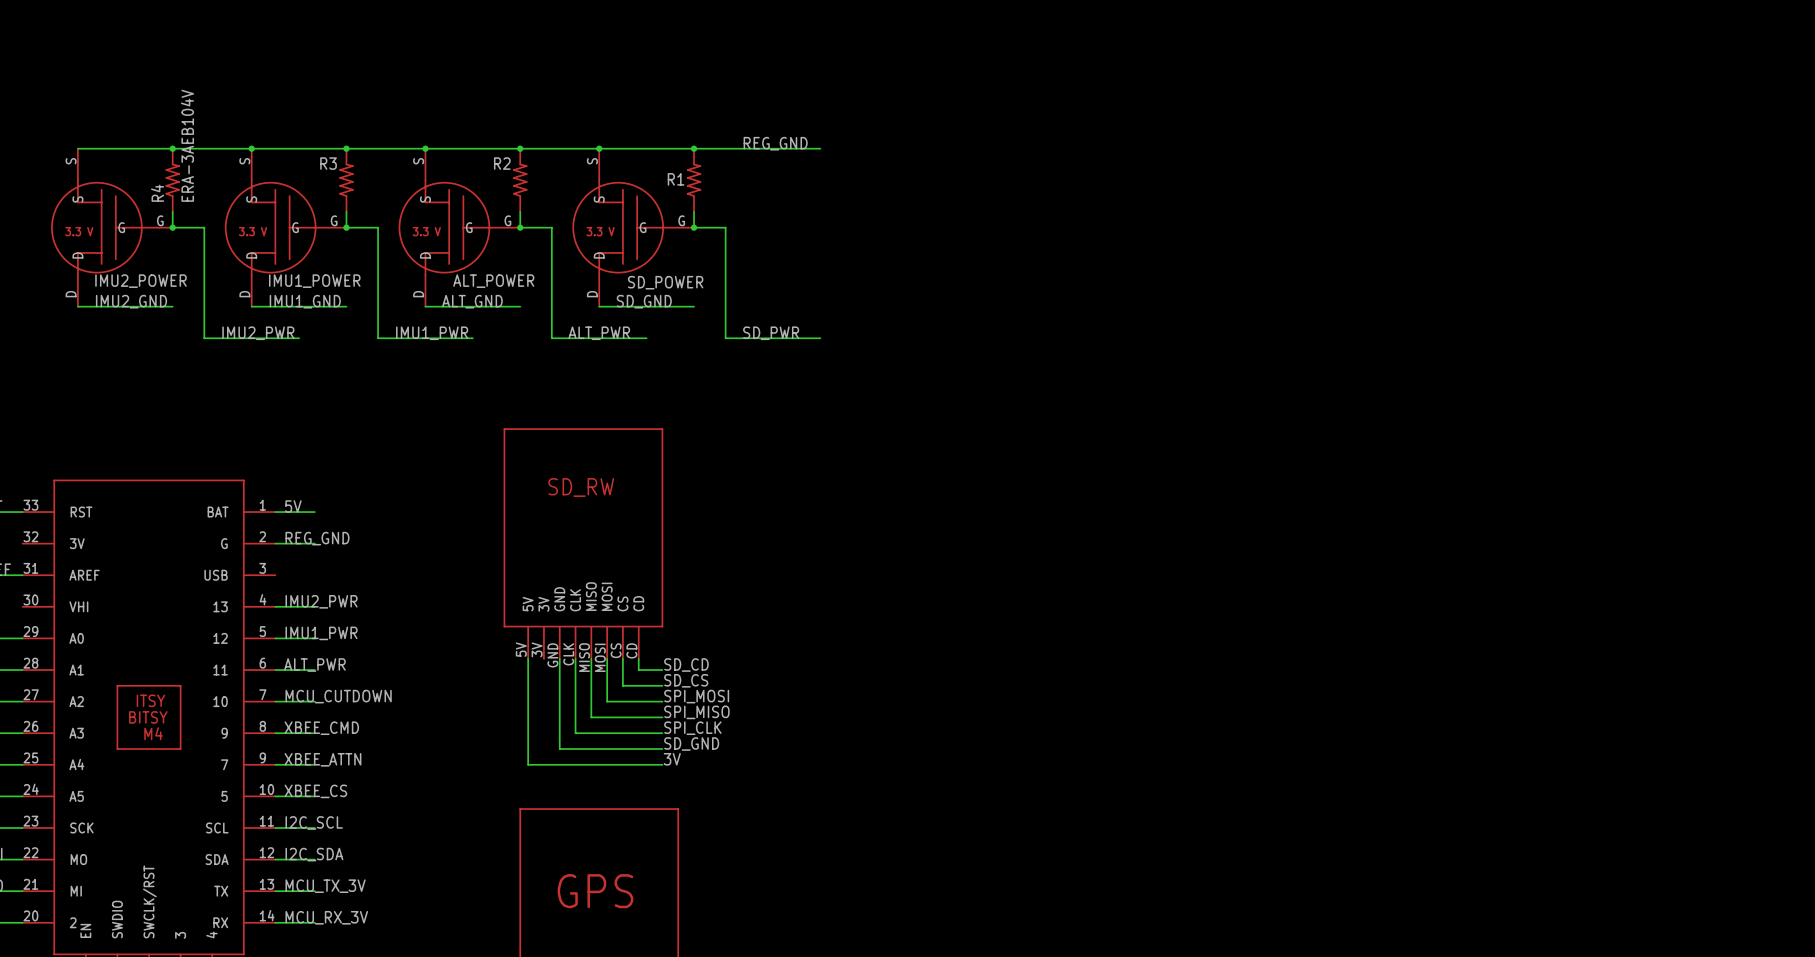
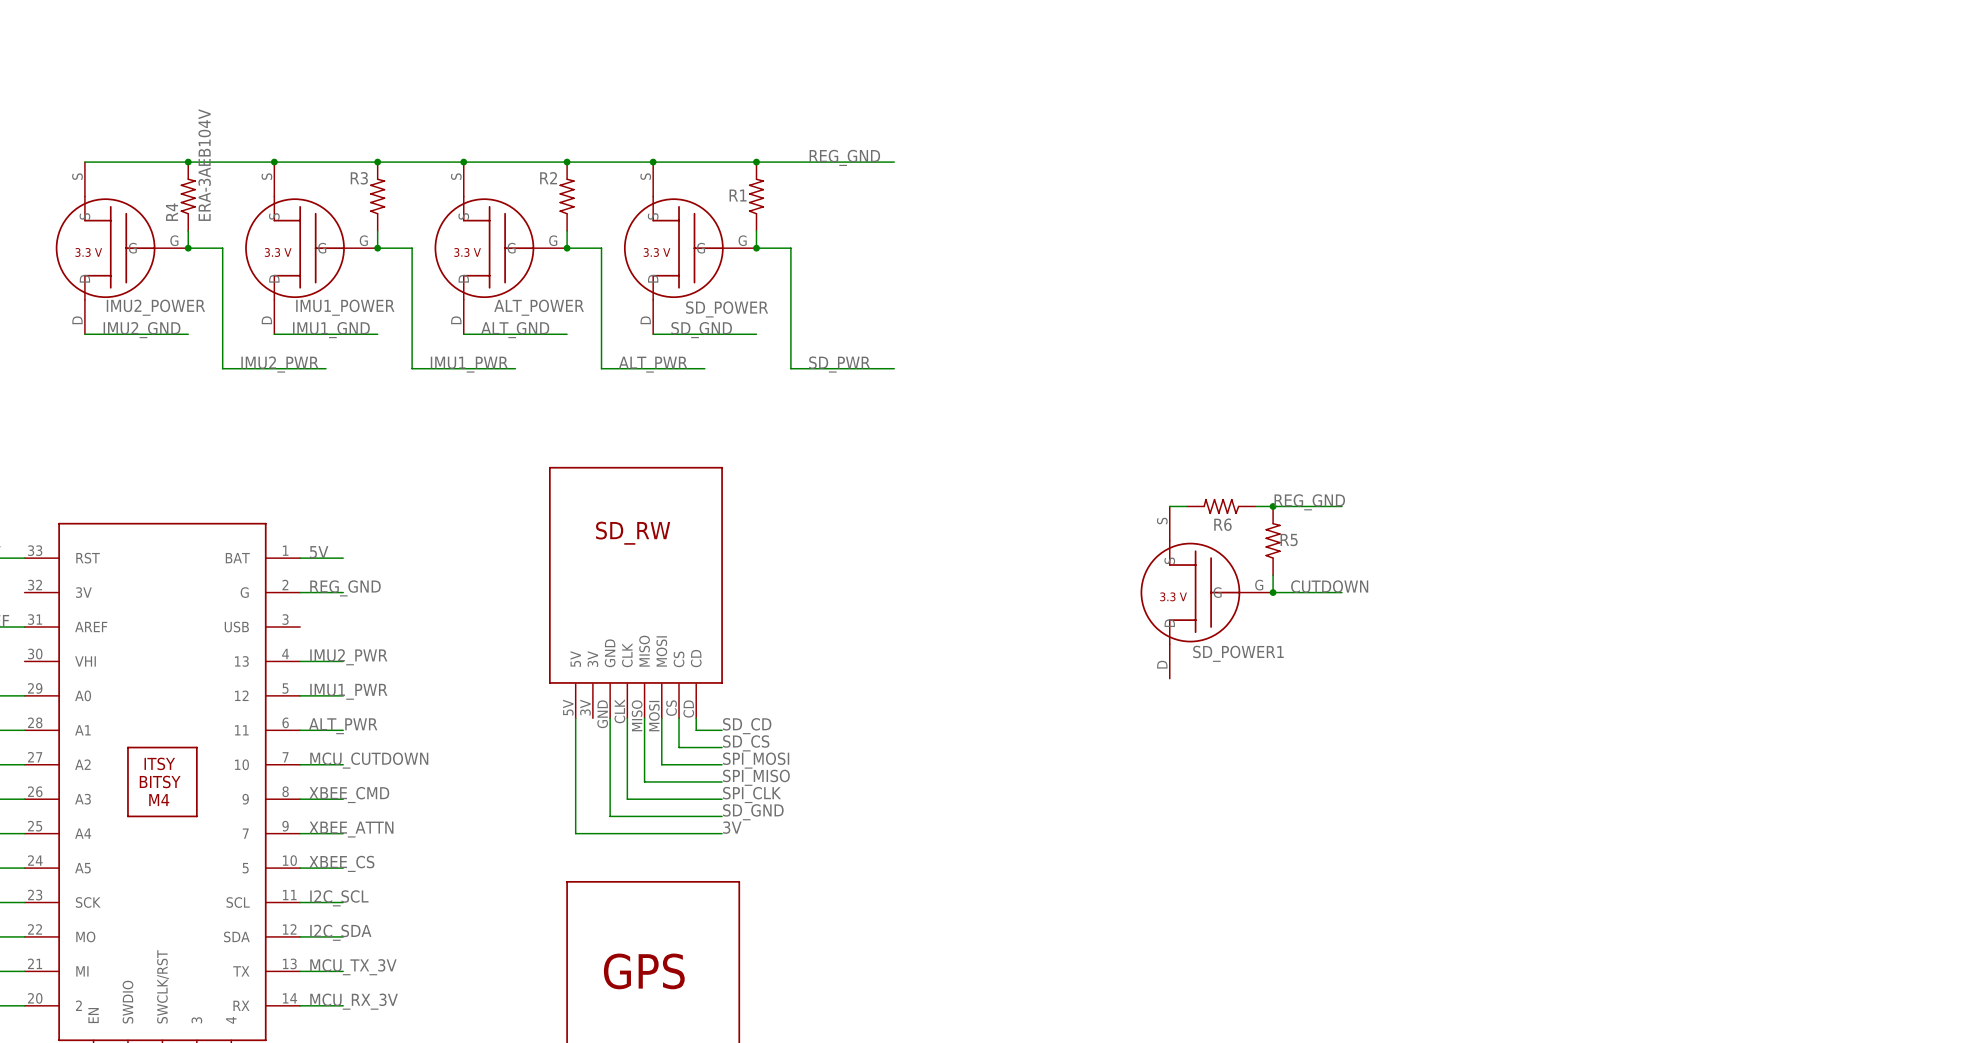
label: none -> REG_GND (1309, 502)
wire: none -> (1169, 506) (1186, 506)
R6: none -> (1221, 506)
wire: none -> (1255, 506) (1341, 506)
junction: none -> (1273, 506)
R5: none -> (1273, 540)
wire: none -> (1273, 575) (1273, 592) (1341, 592)
label: none -> CUTDOWN (1329, 586)
SD_POWER1: none -> (1206, 592)
junction: none -> (1273, 592)

